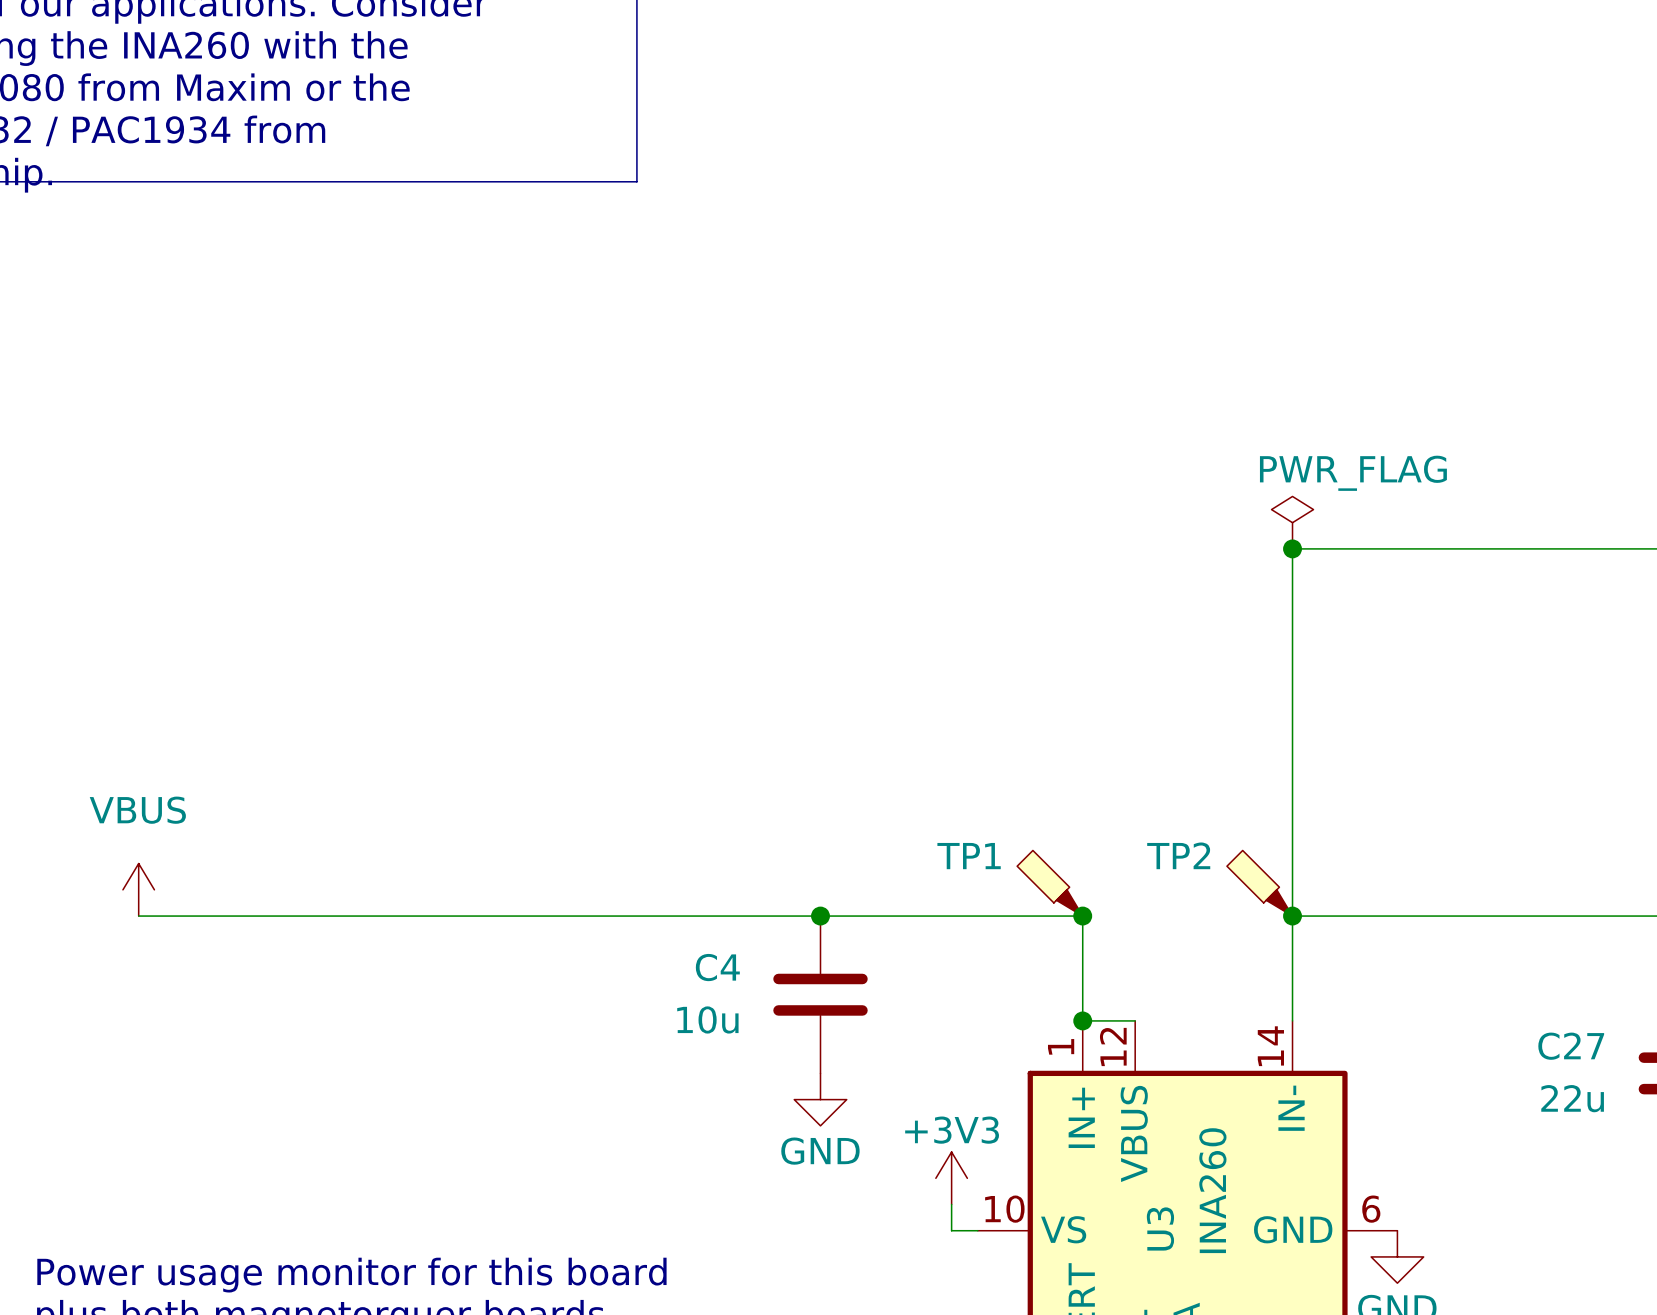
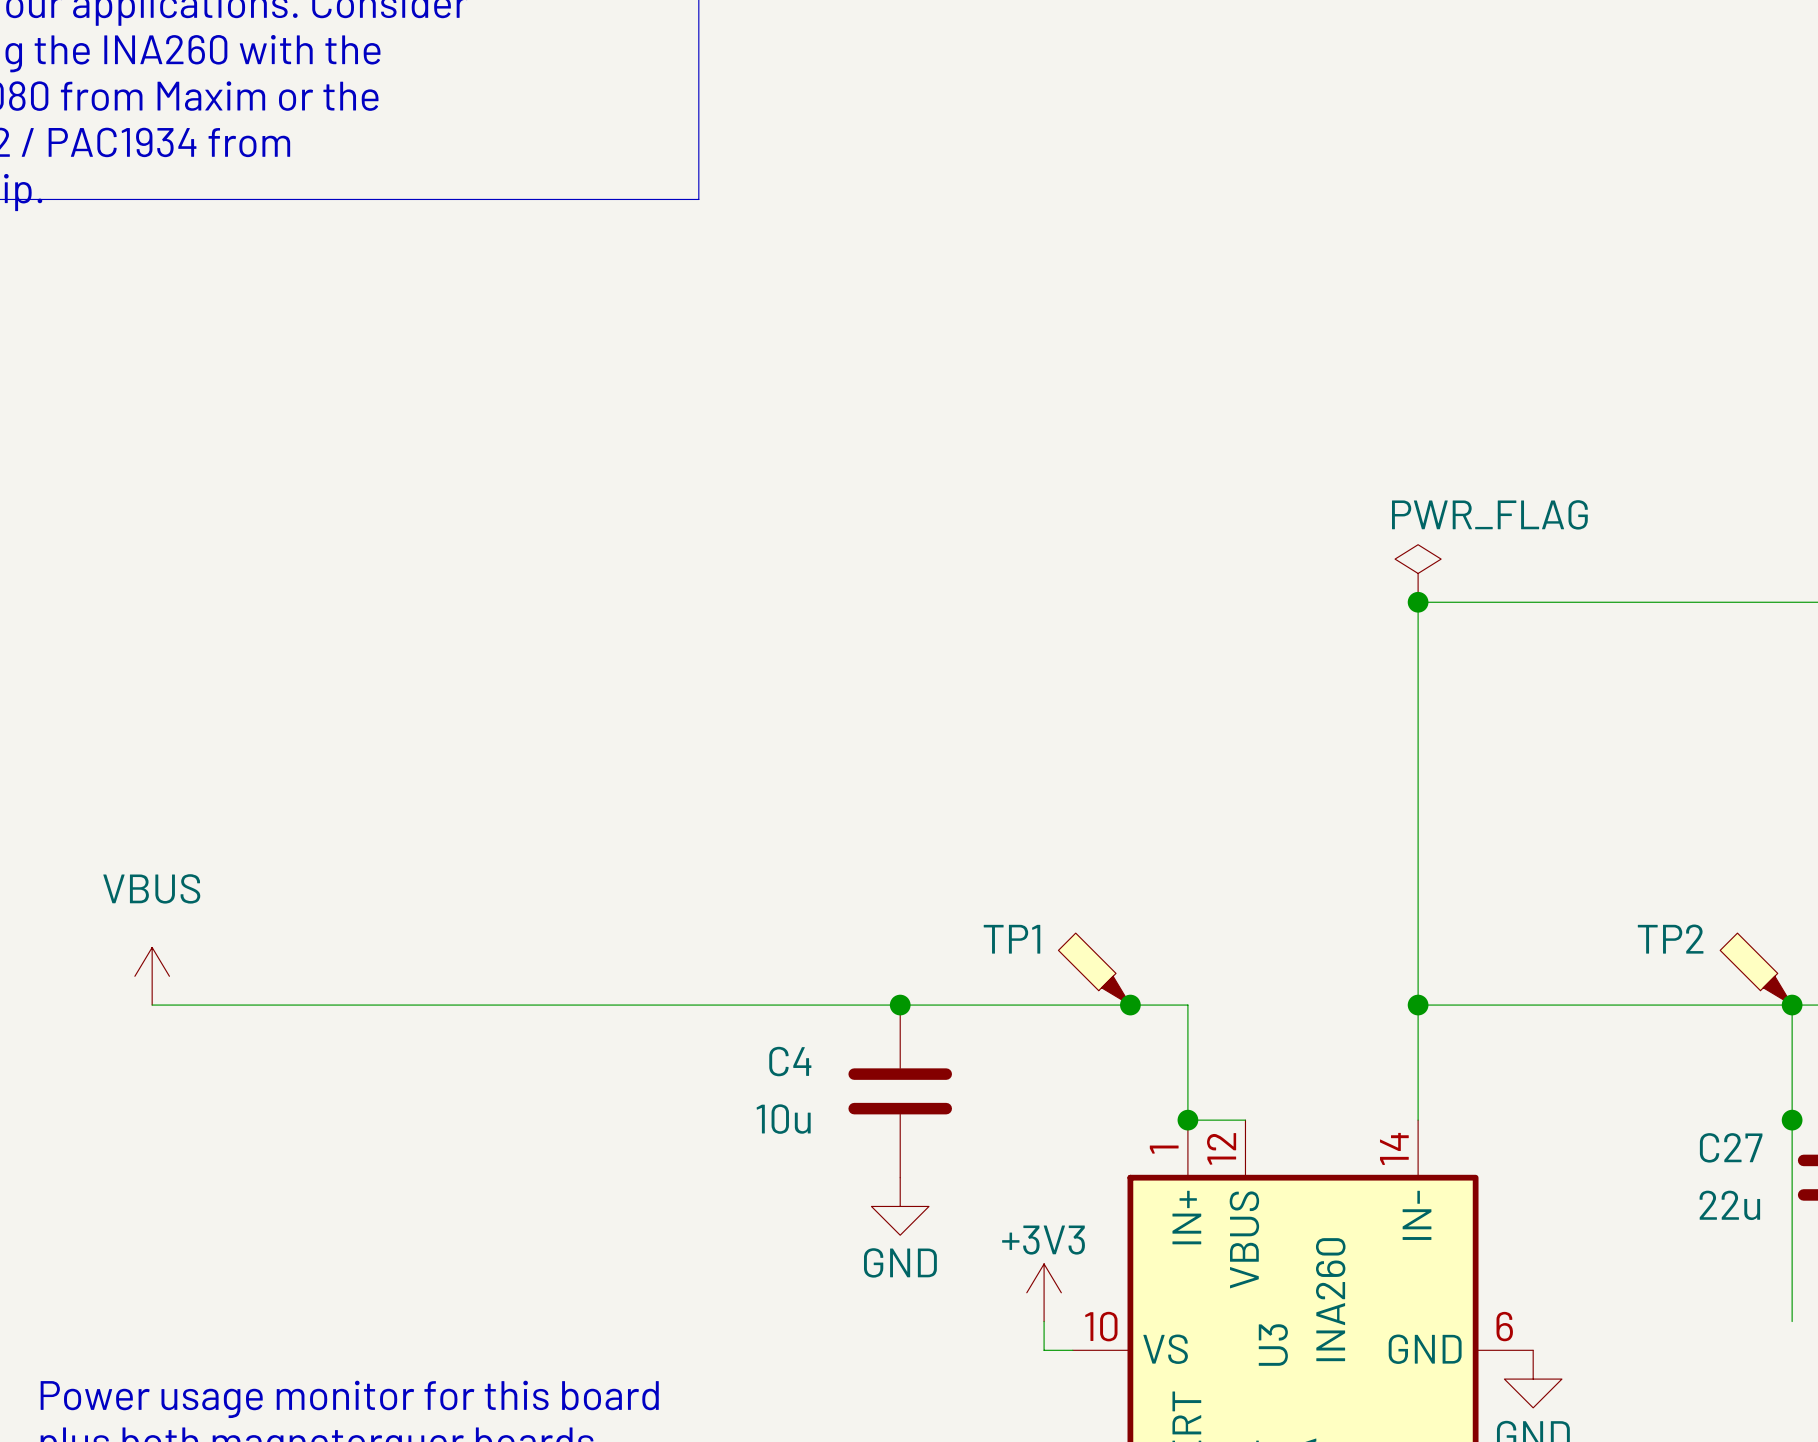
TP1 position: (1049, 883) -> (1094, 969)
TP2 position: (1259, 883) -> (1756, 969)
junction position: (1082, 916) -> (1130, 1005)
wire: none -> (1792, 1005) (1792, 1321)
junction: none -> (1792, 1005)
junction: none -> (1792, 1120)

